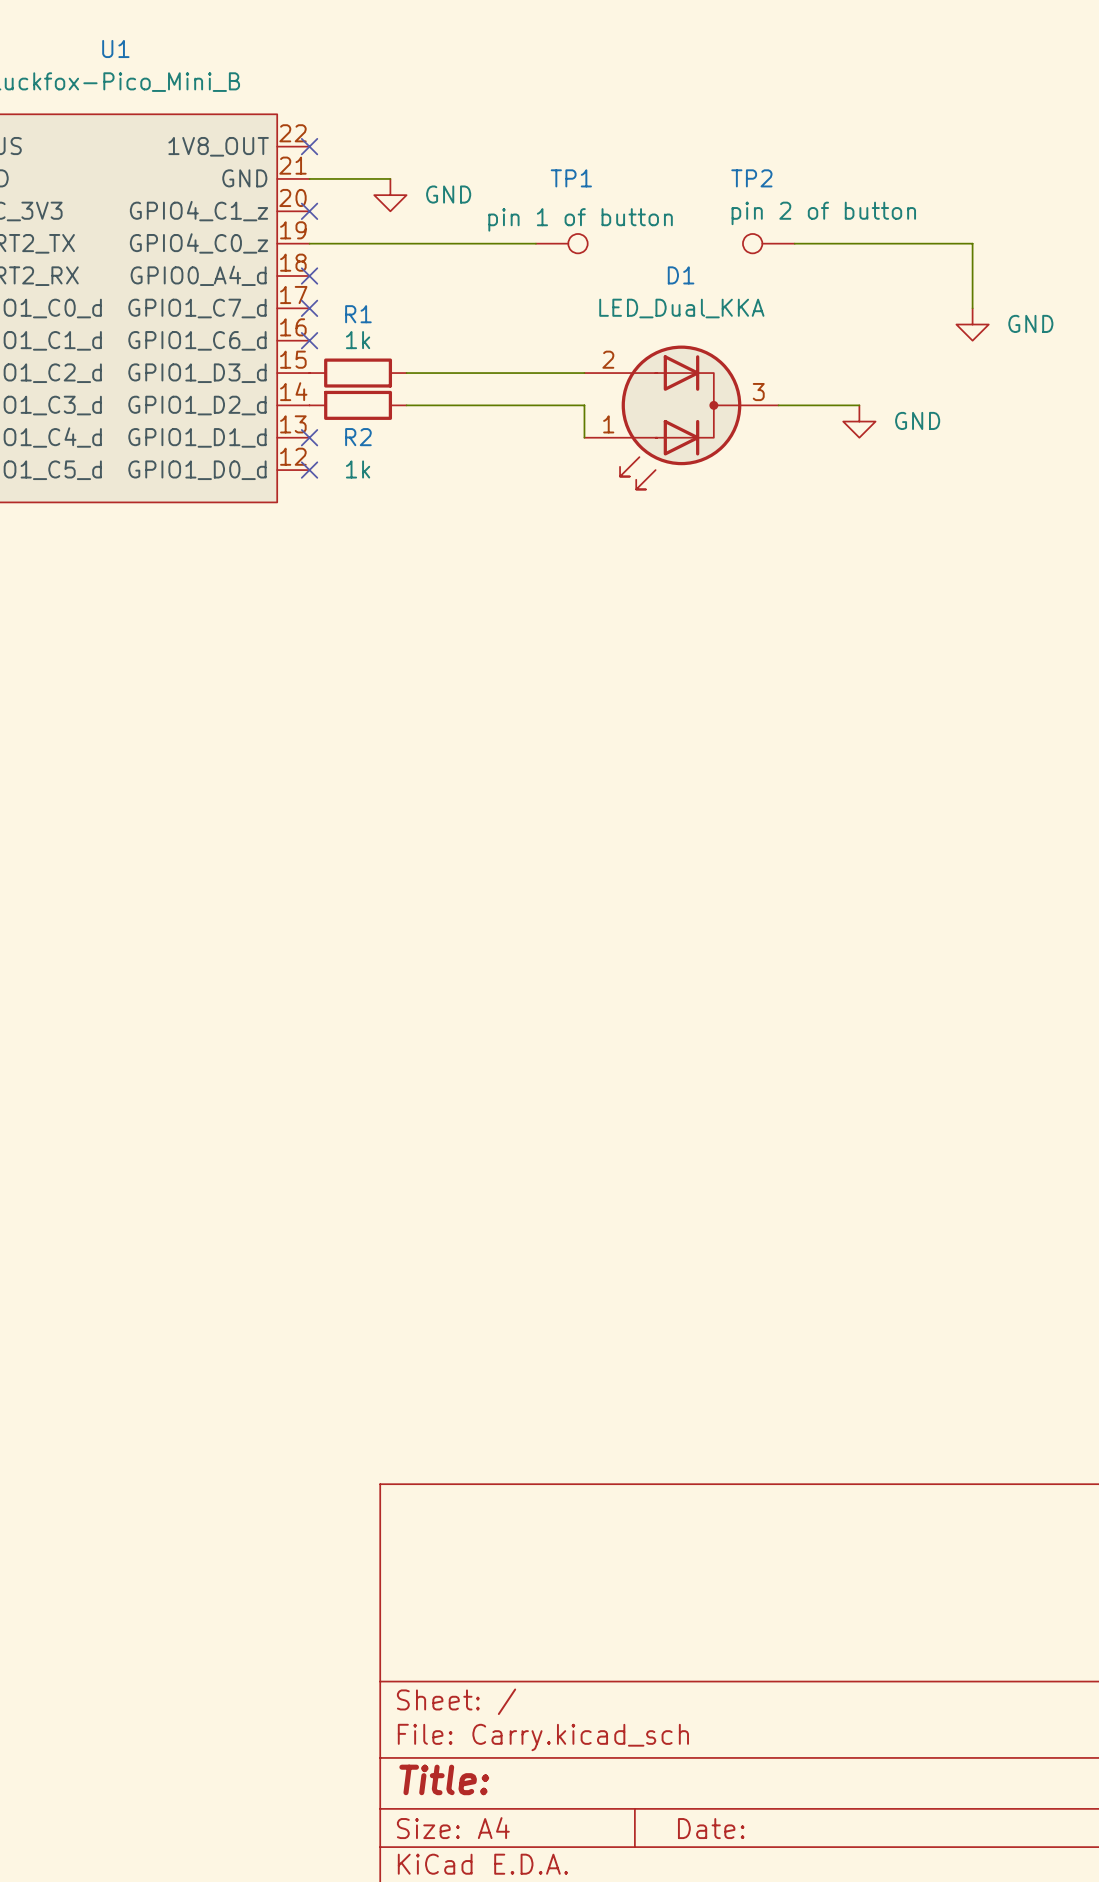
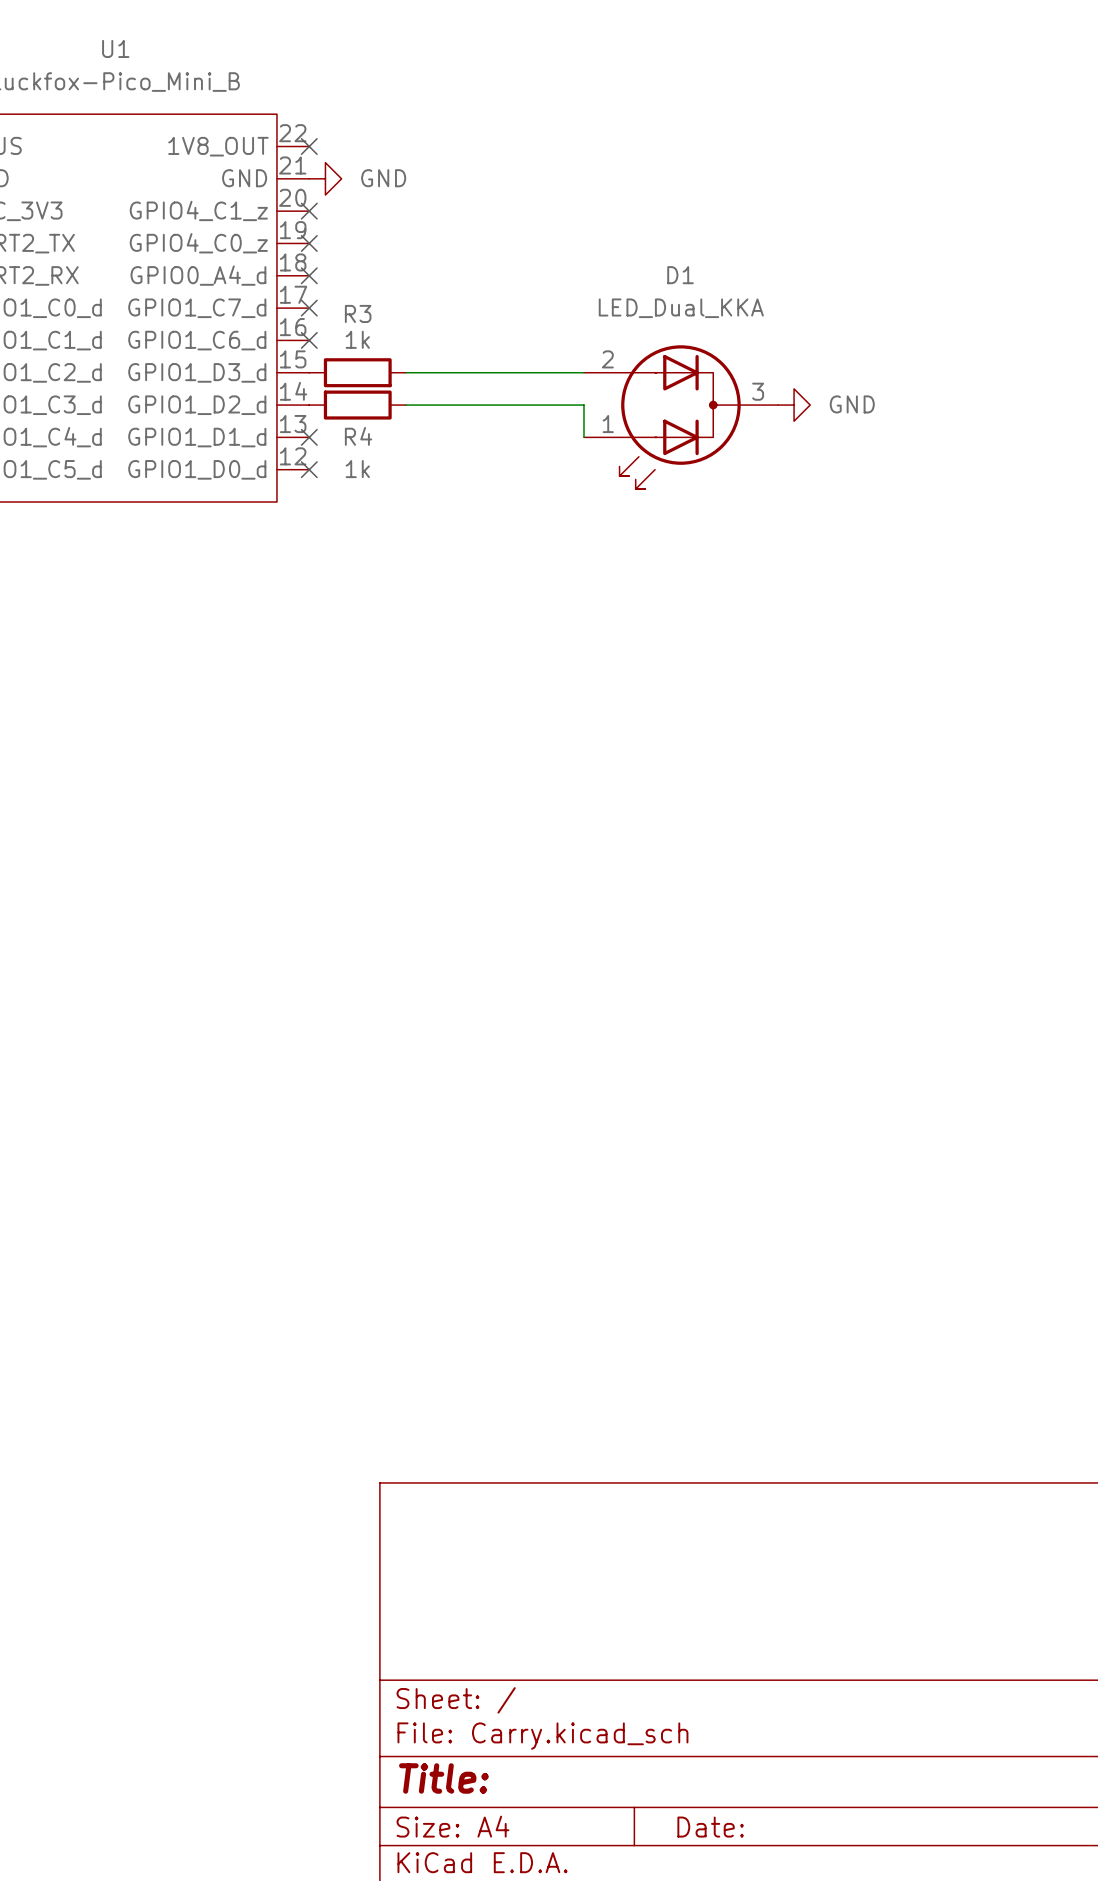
wire: (309, 178) (390, 178) -> none
power symbol rotation: 0° (390, 195) -> 90° counterclockwise (325, 178)
power symbol position: GND (390, 195) -> GND (325, 178)
wire: (309, 243) (535, 243) -> none
no-connect mark: none -> (309, 243)
TP1: pin 1 of button (561, 243) -> none
TP2: pin 2 of button (768, 243) -> none
wire: (794, 243) (972, 243) (972, 308) -> none
R1 name: R1 (358, 314) -> R3 (358, 313)
power symbol: GND (972, 324) -> none
wire: (778, 405) (859, 405) -> none
power symbol rotation: 0° (859, 421) -> 90° counterclockwise (794, 405)
power symbol position: GND (859, 421) -> GND (794, 405)
R2 name: R2 (358, 437) -> R4 (358, 436)

